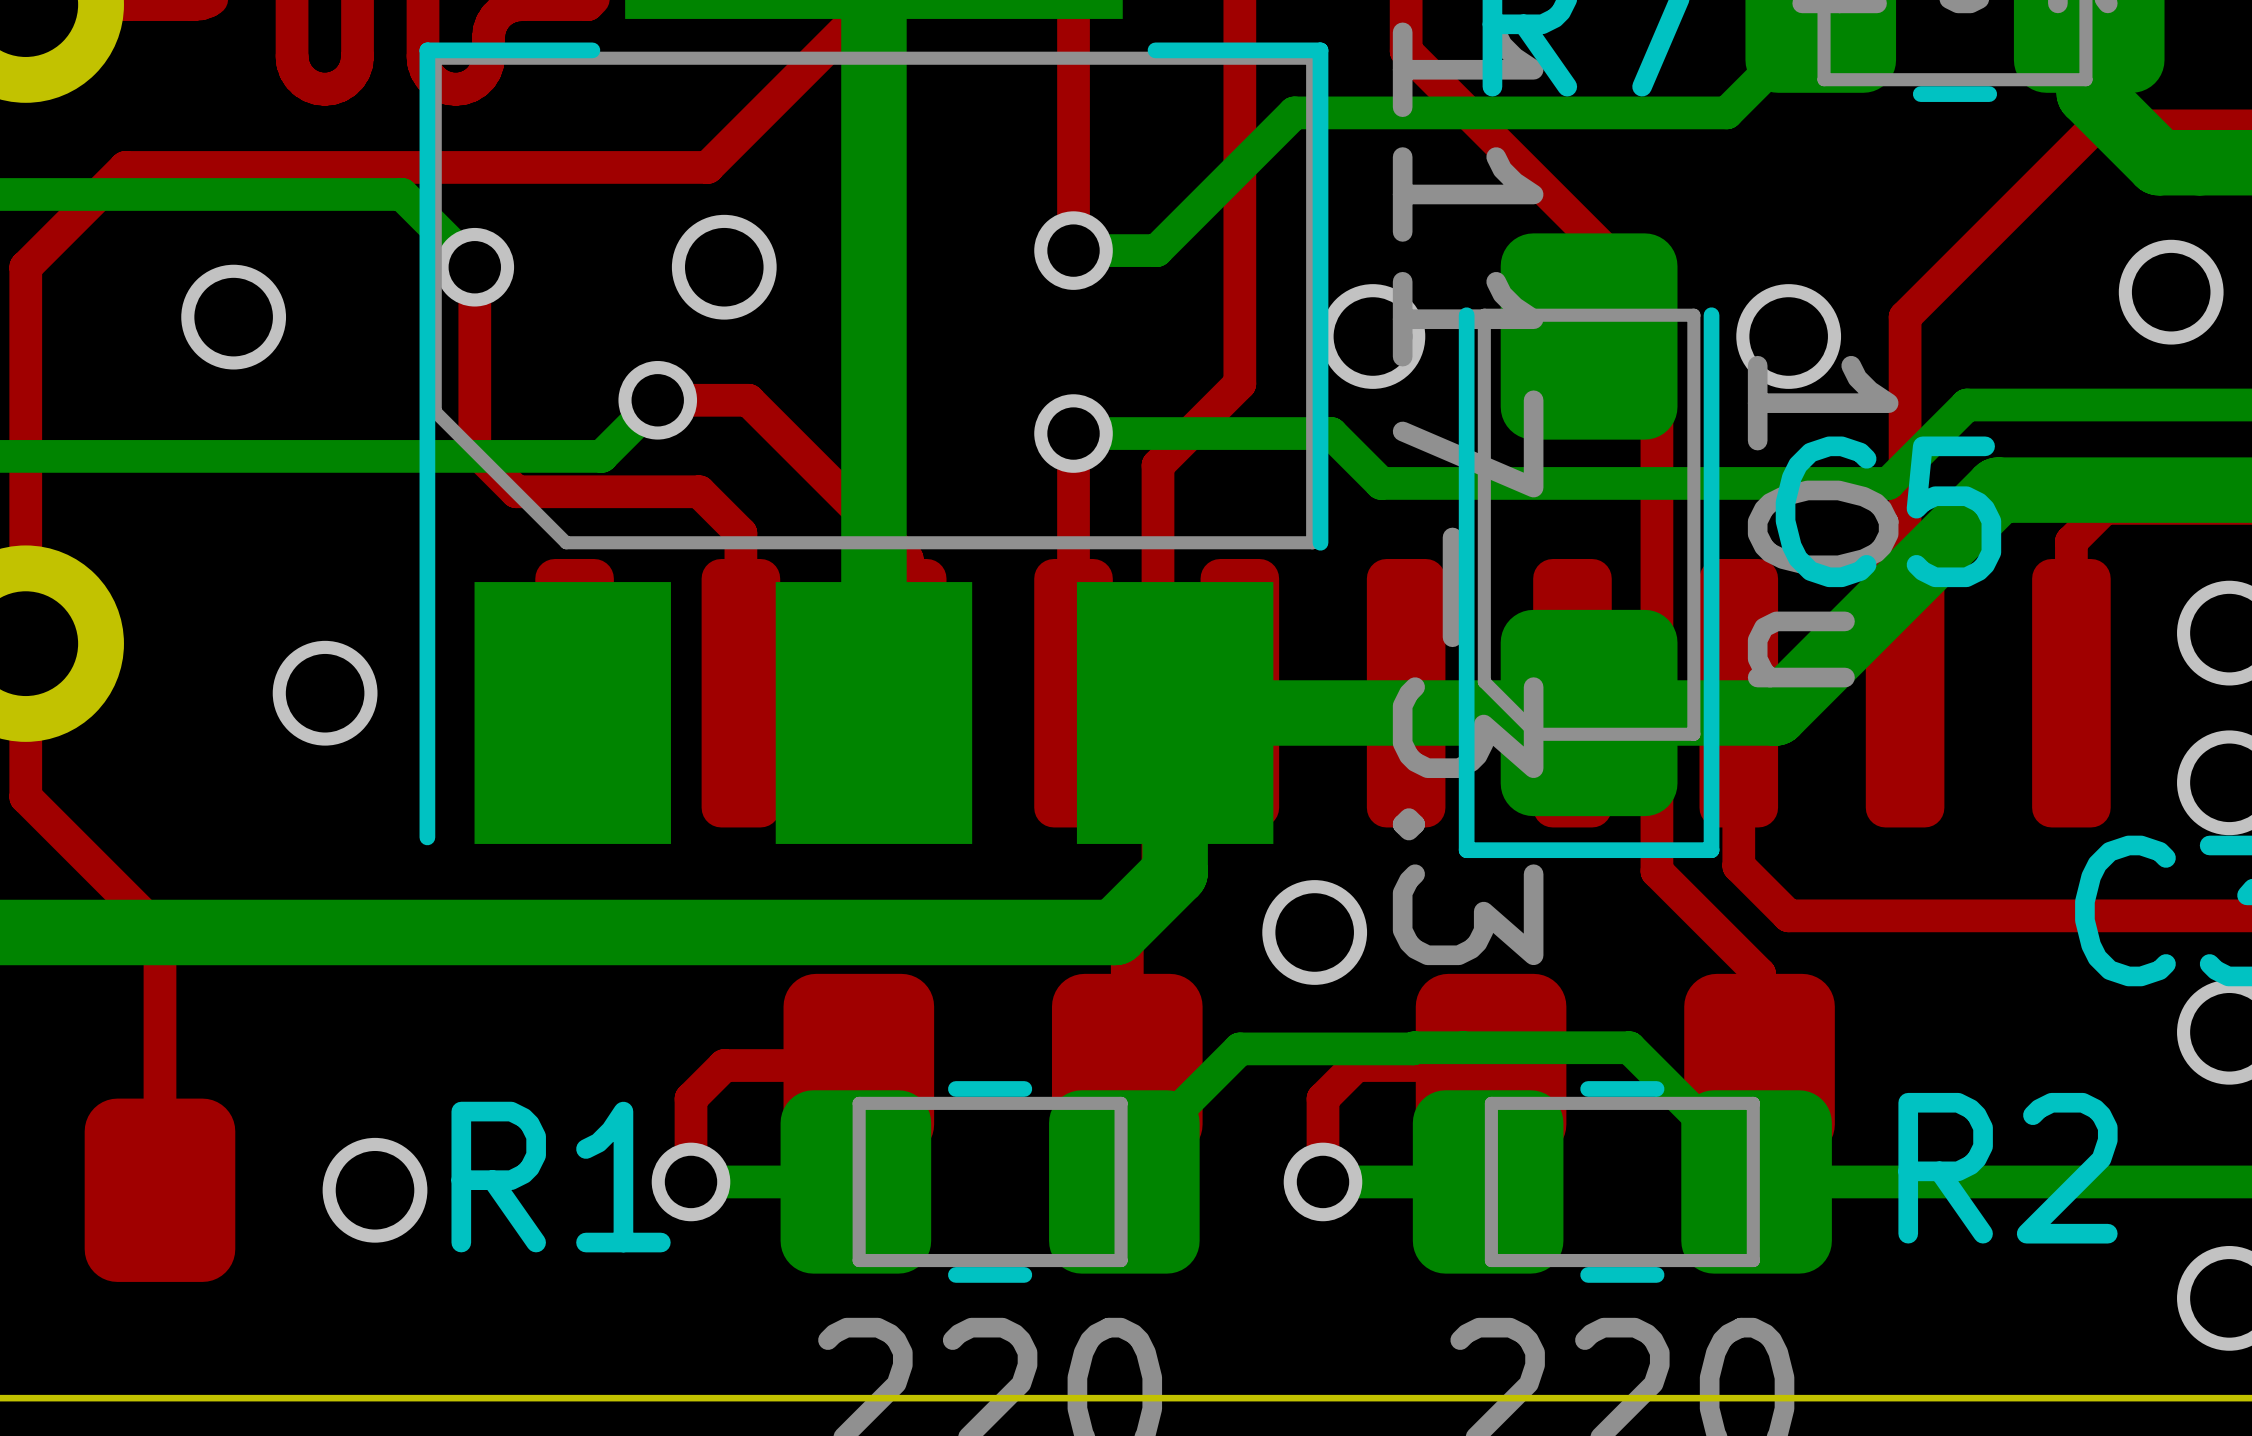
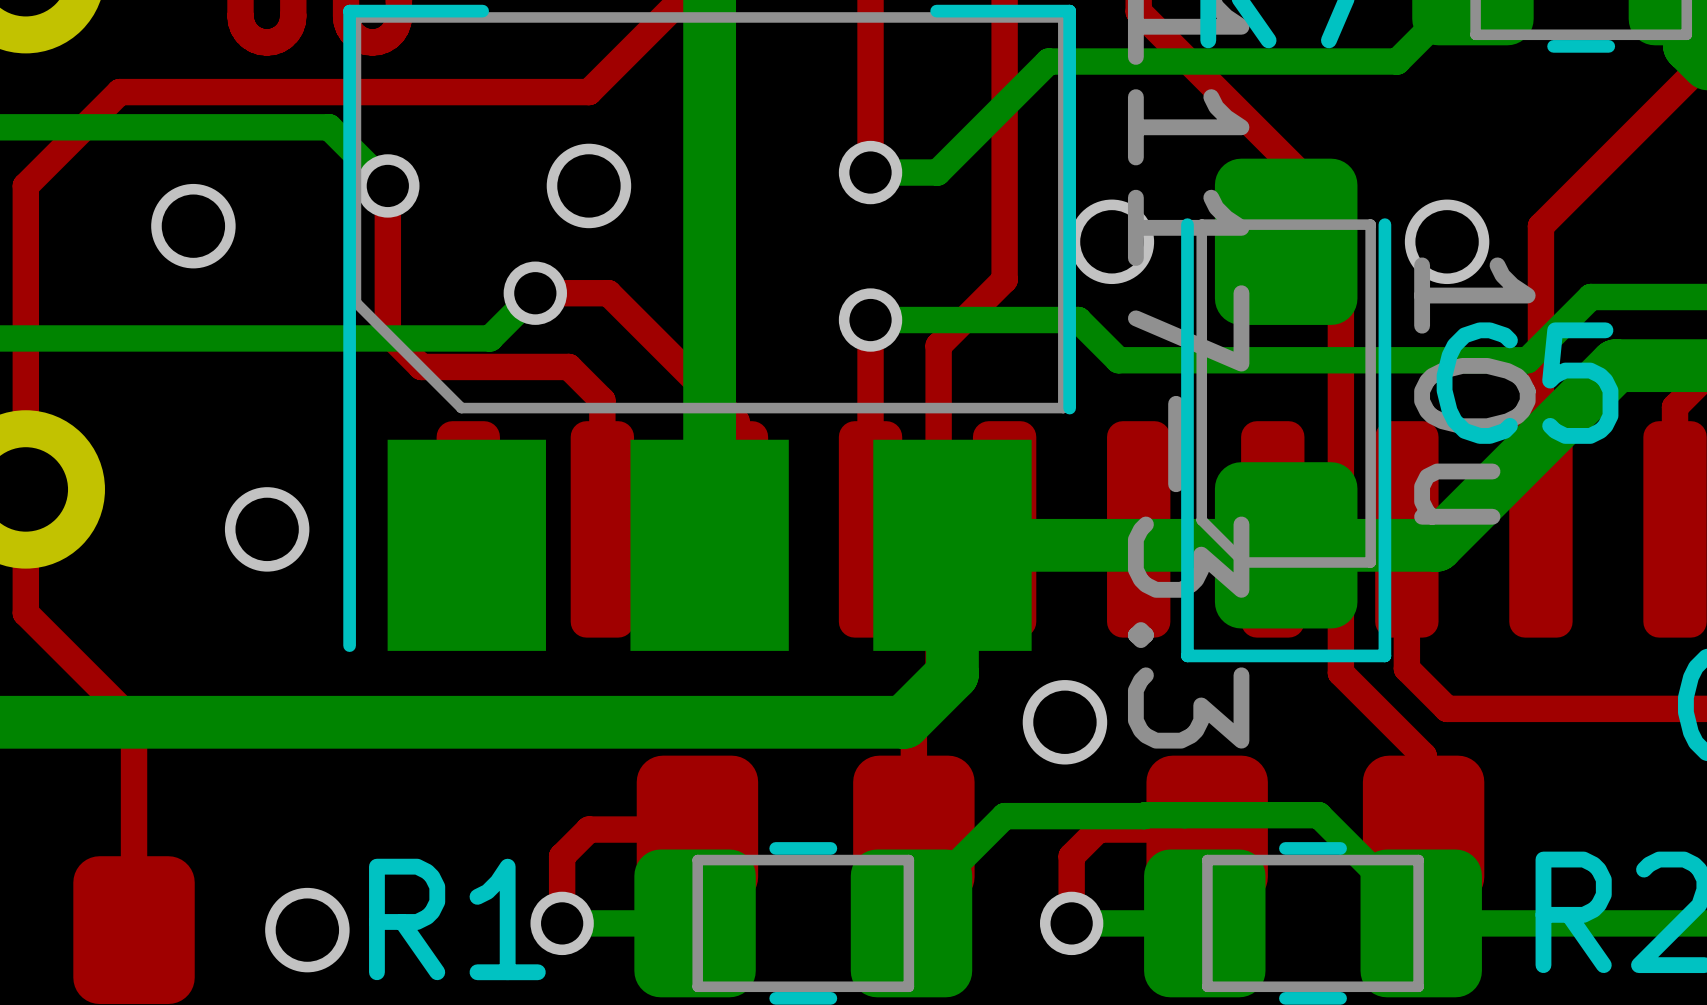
top track: (724, 150) (707, 167) (125, 167) -> (588, 92) (119, 92) (106, 105)

